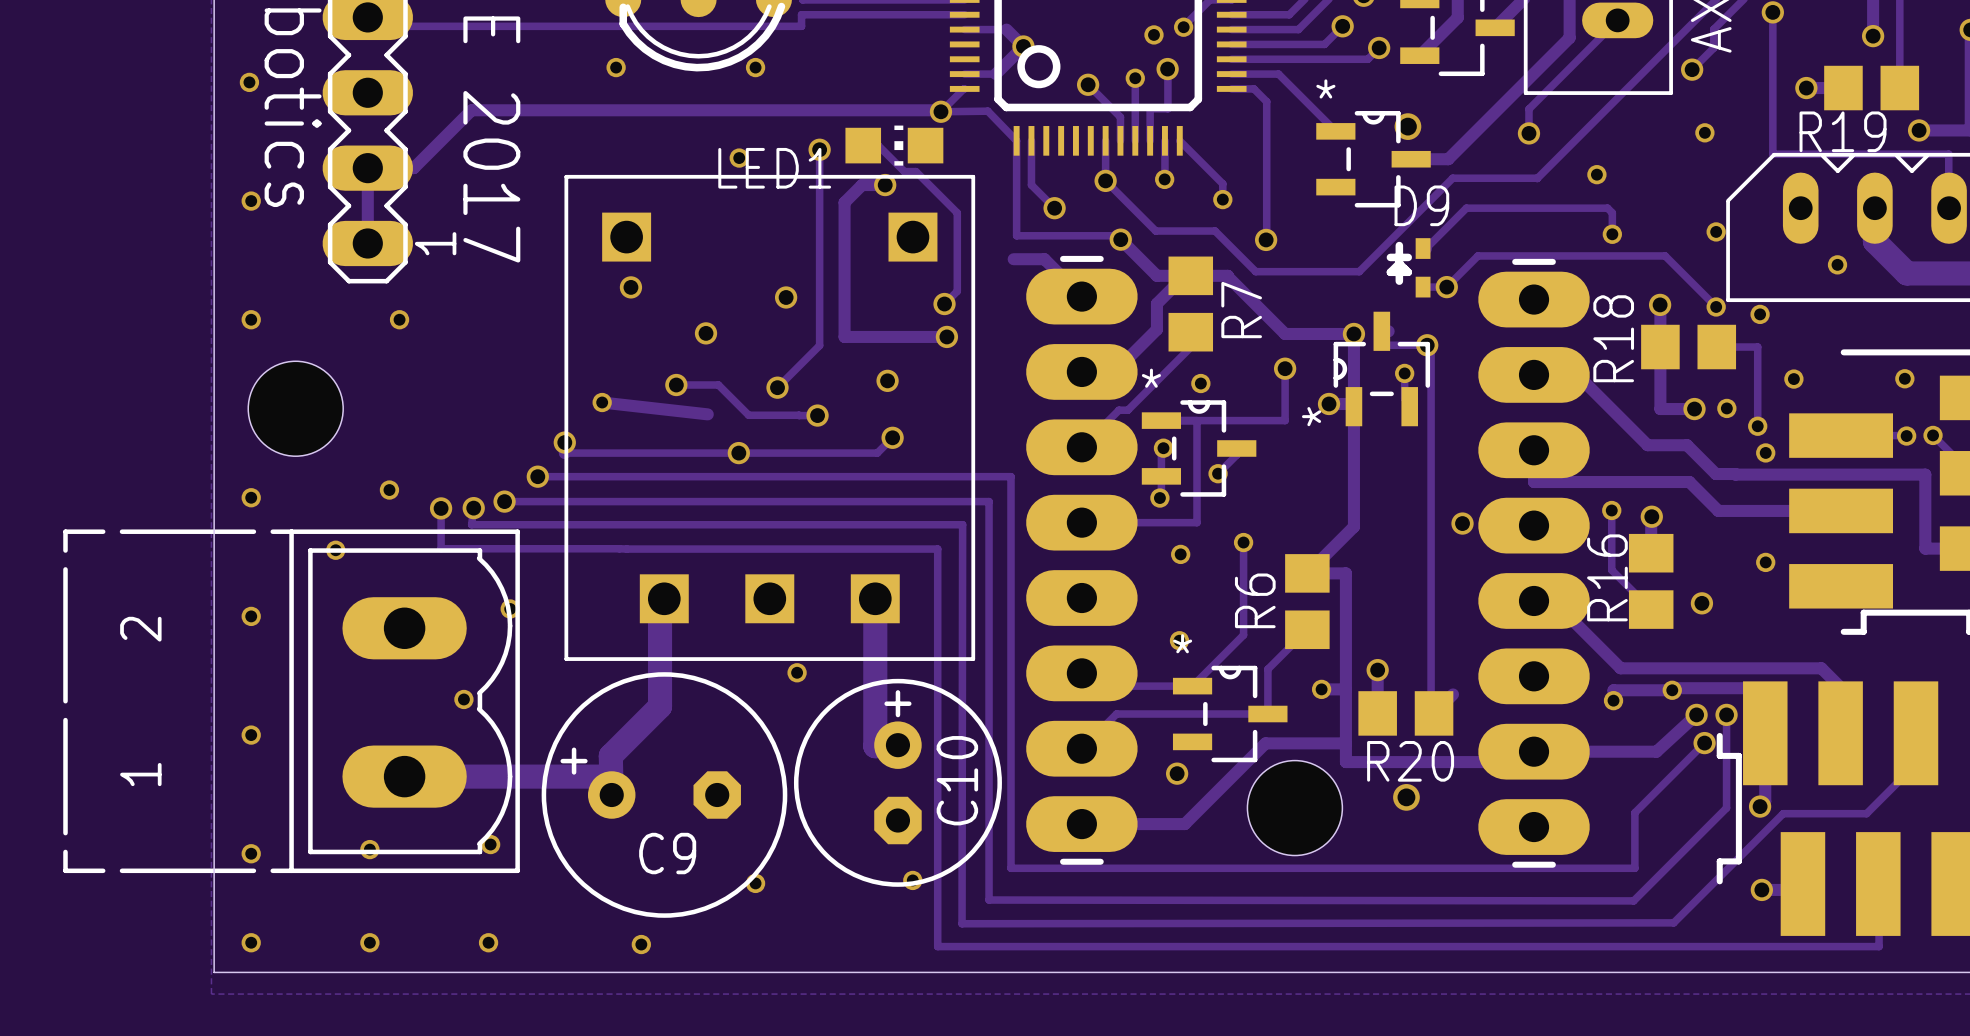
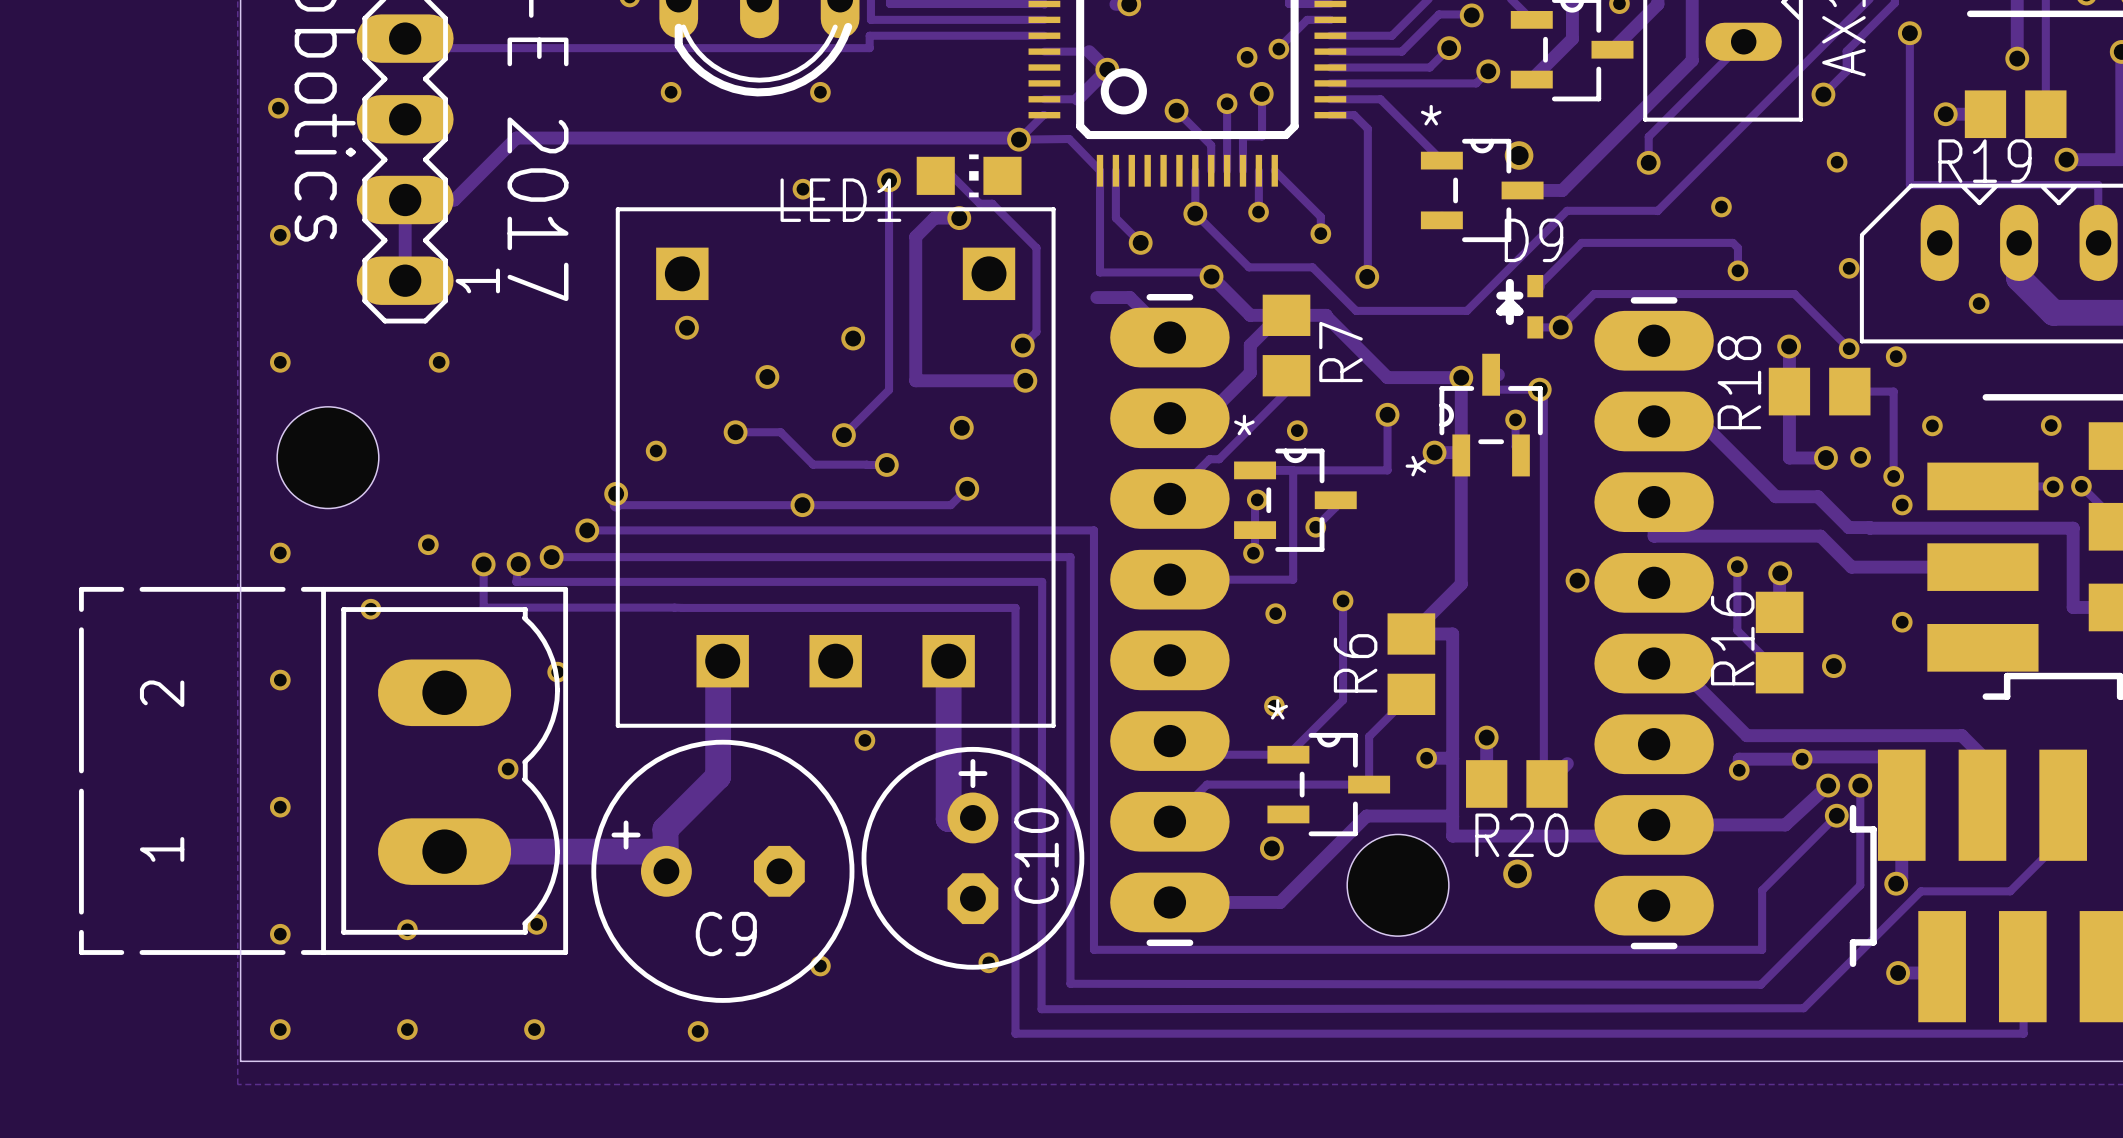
track: (602, 402) (707, 414) -> none

